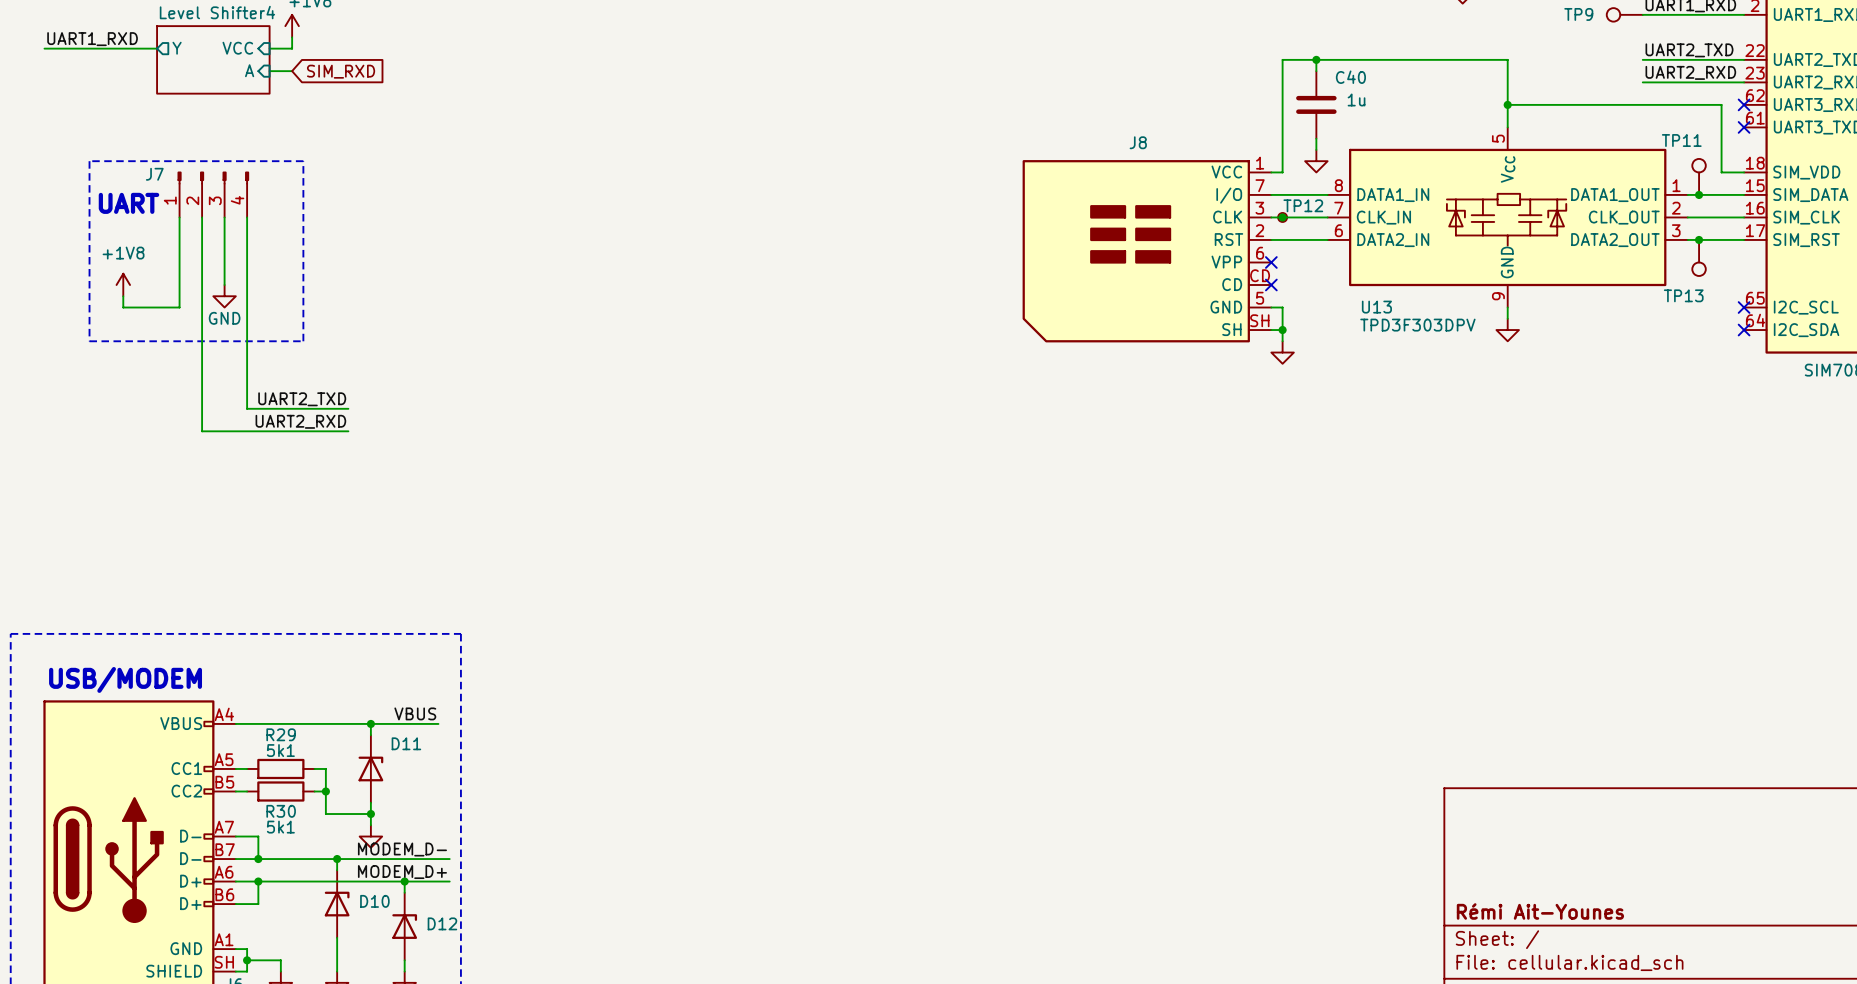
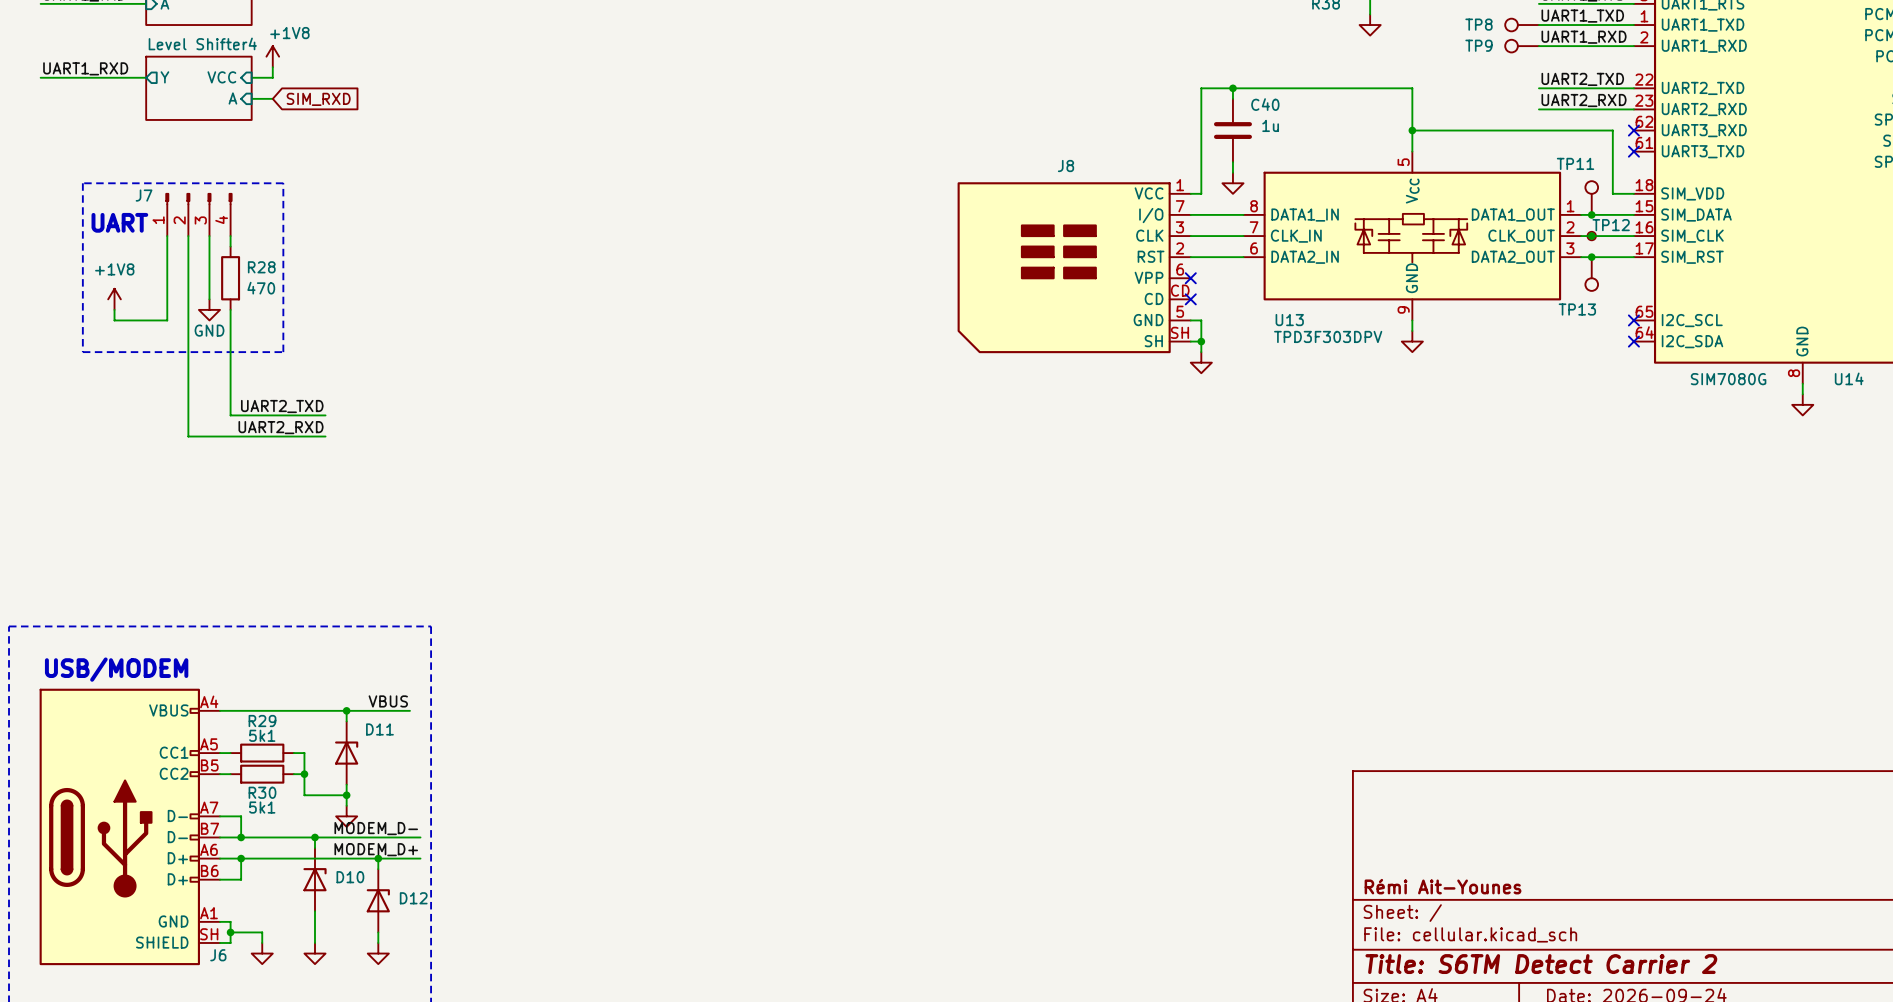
junction: (1282, 217) -> none
TP12 position: (1282, 217) -> (1591, 236)
junction: none -> (1591, 236)
wire: (247, 228) (247, 296) -> none
R28: none -> 470 (230, 278)

